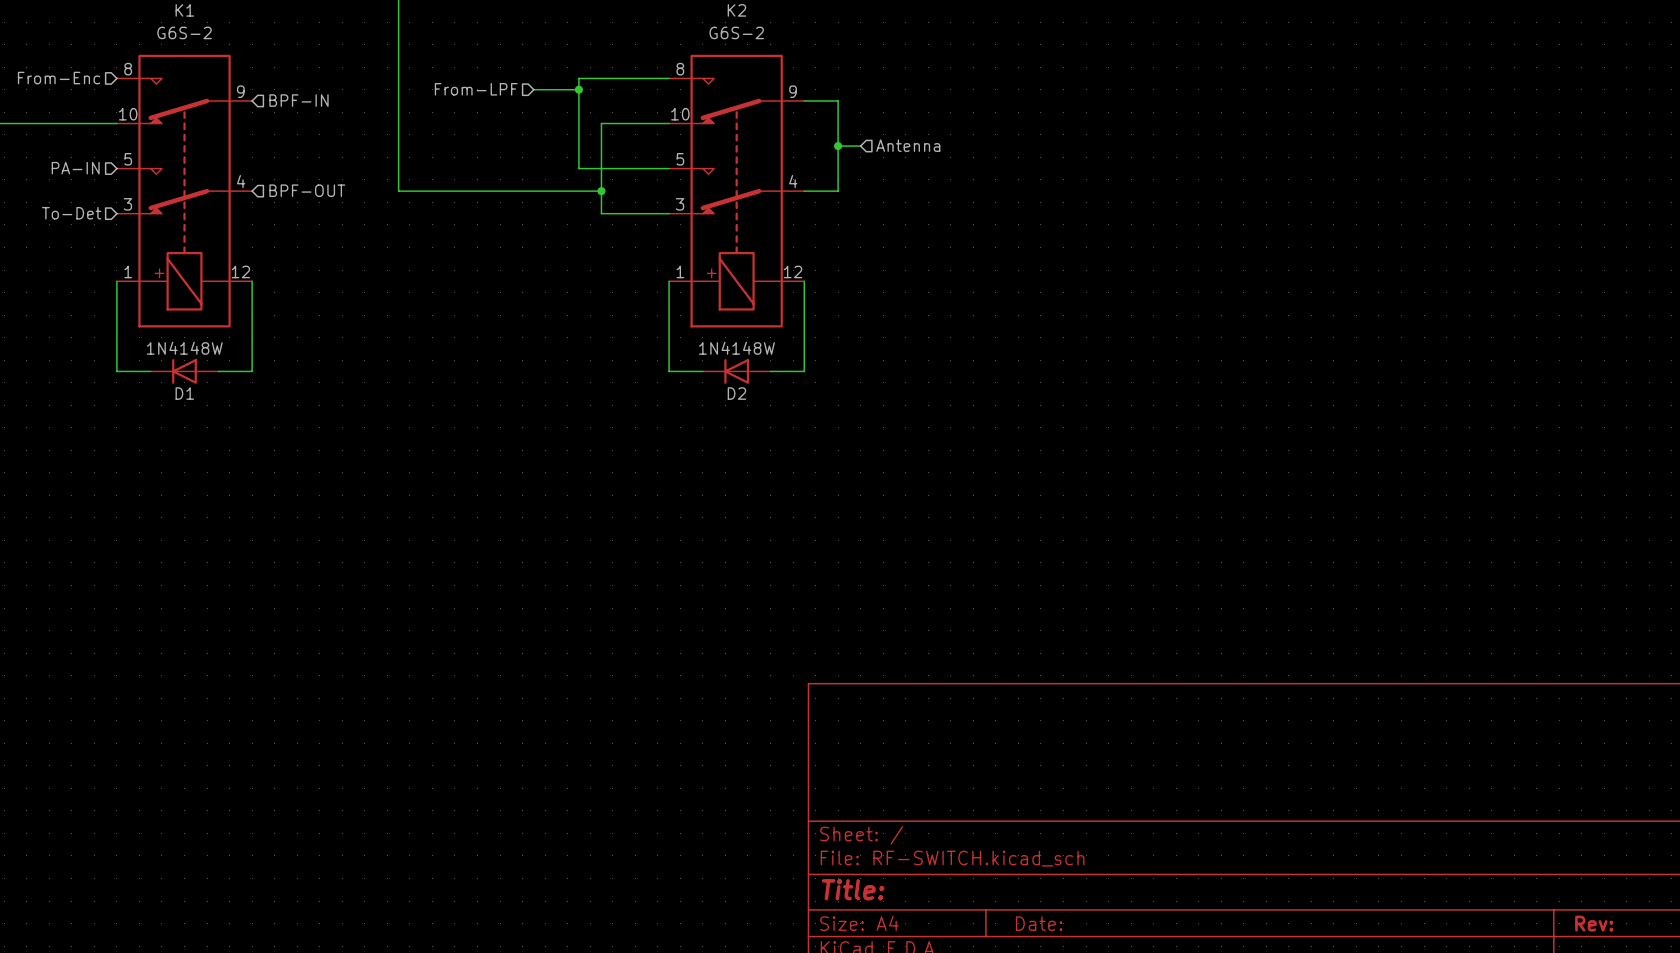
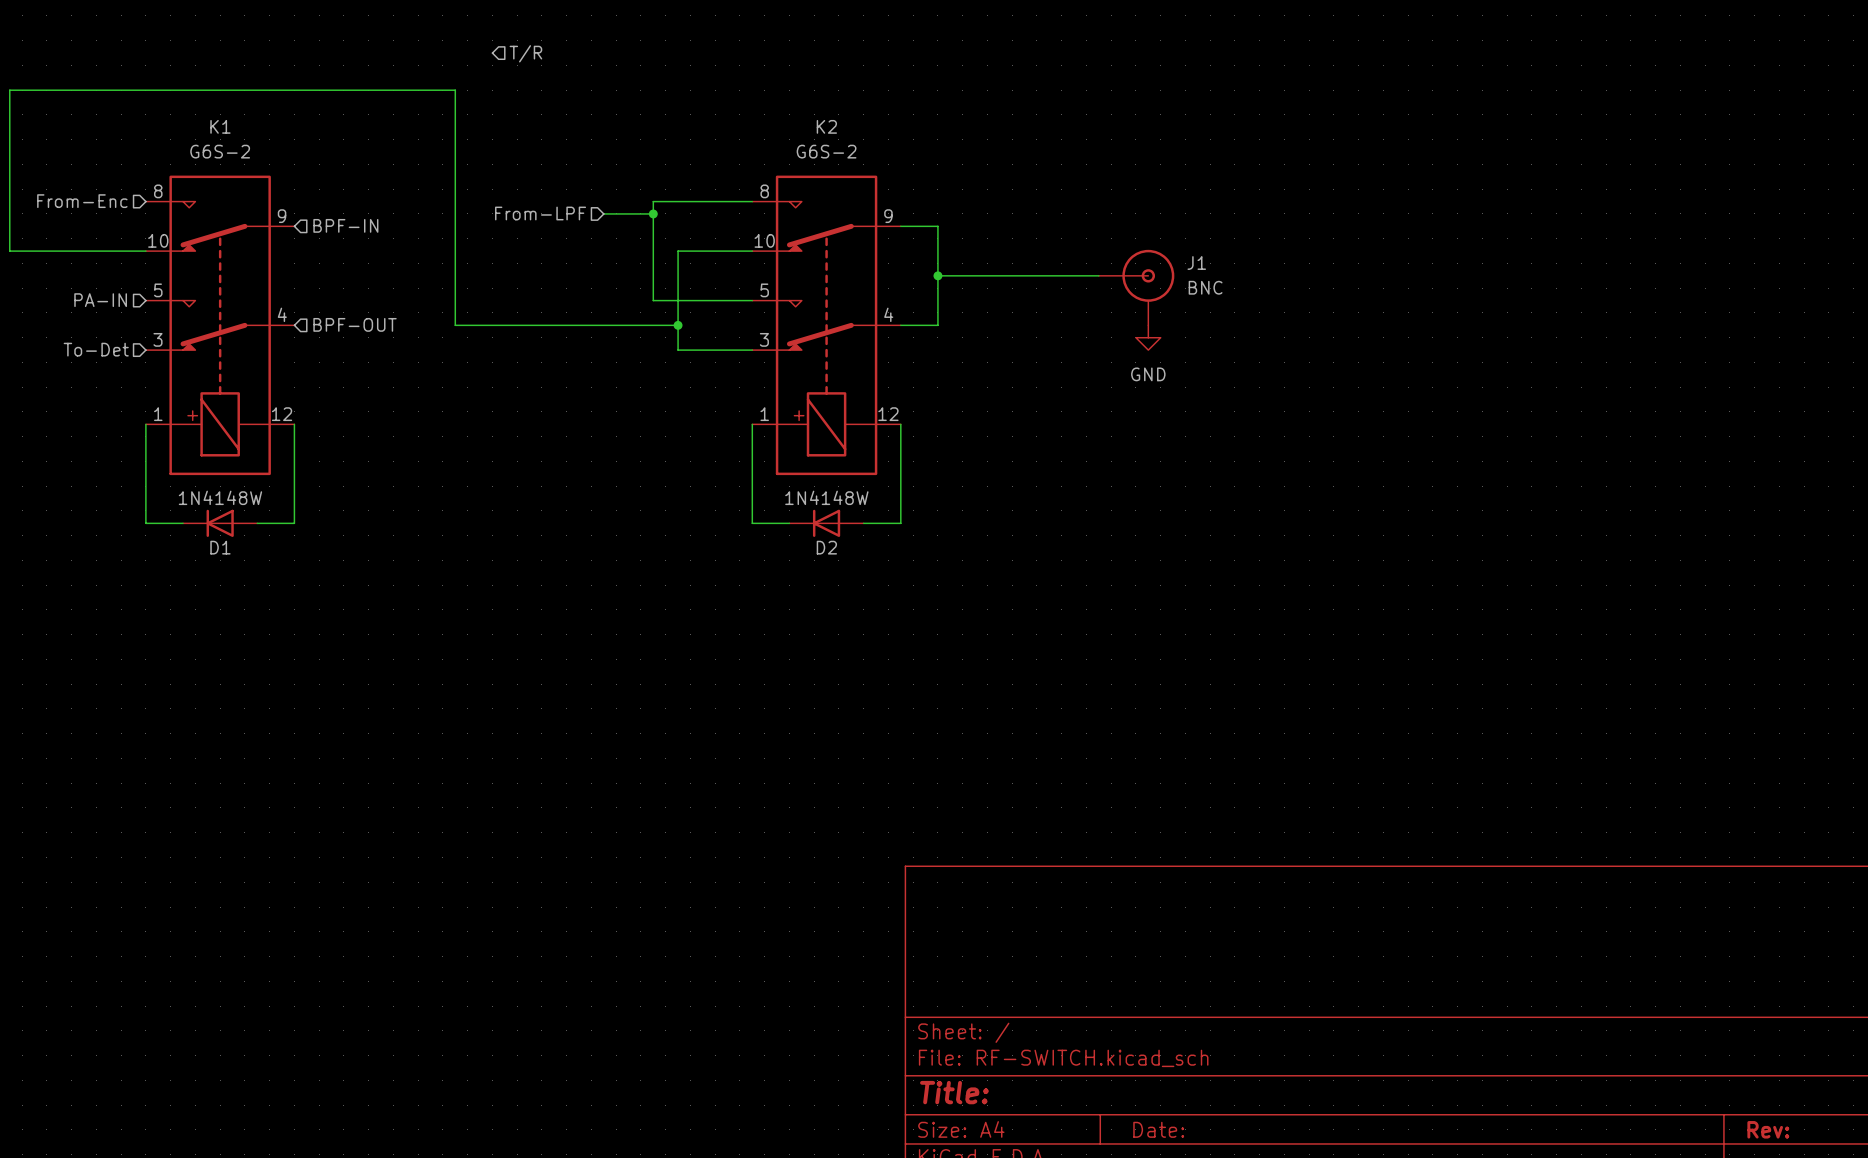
hierarchical label: Antenna (908, 145) -> none
wire: none -> (962, 275) (1098, 275)
J1: none -> BNC (1136, 287)
power symbol: none -> GND (1148, 337)

